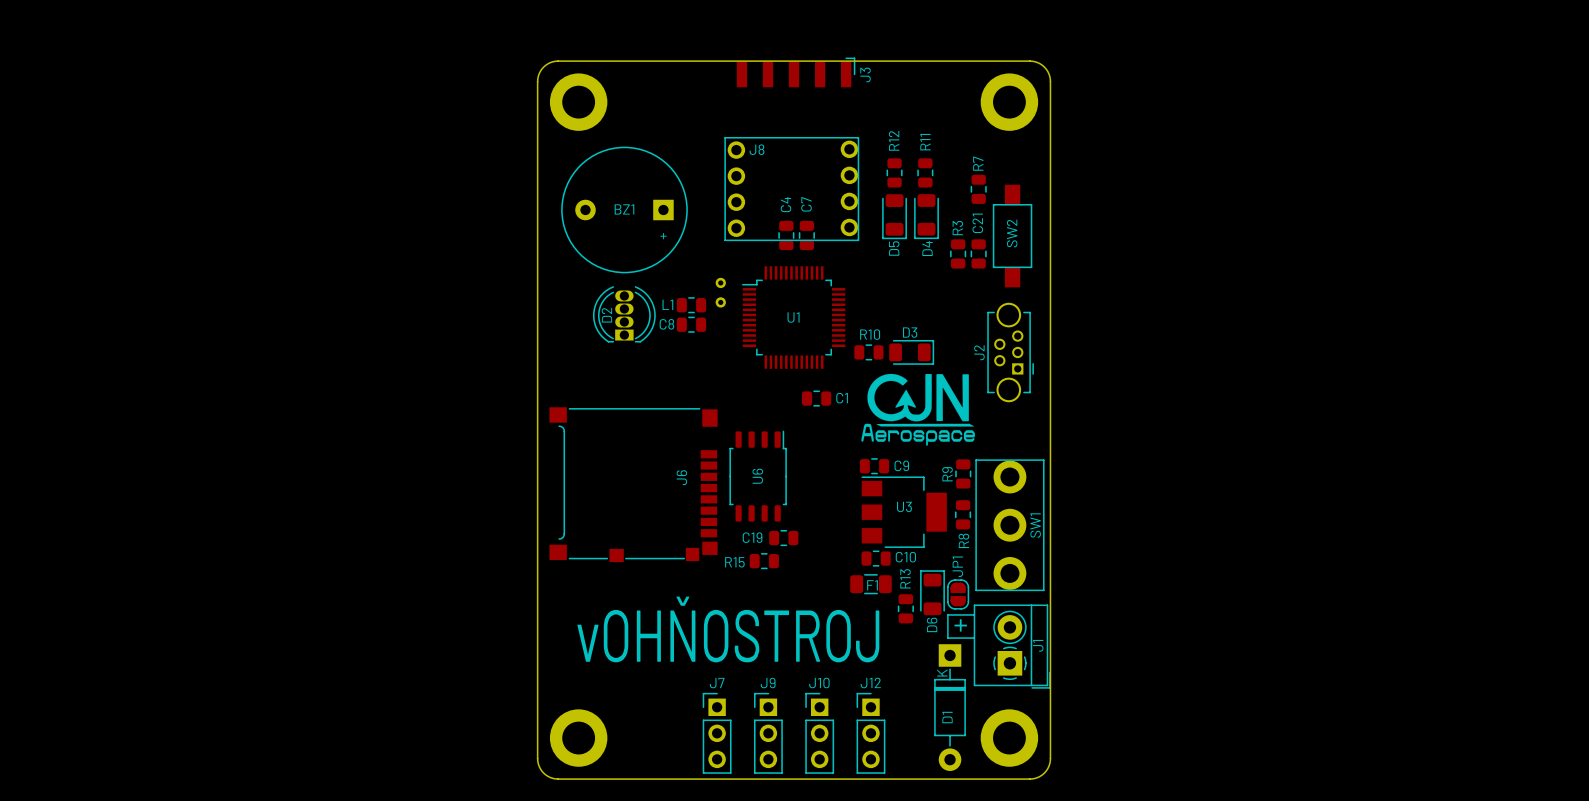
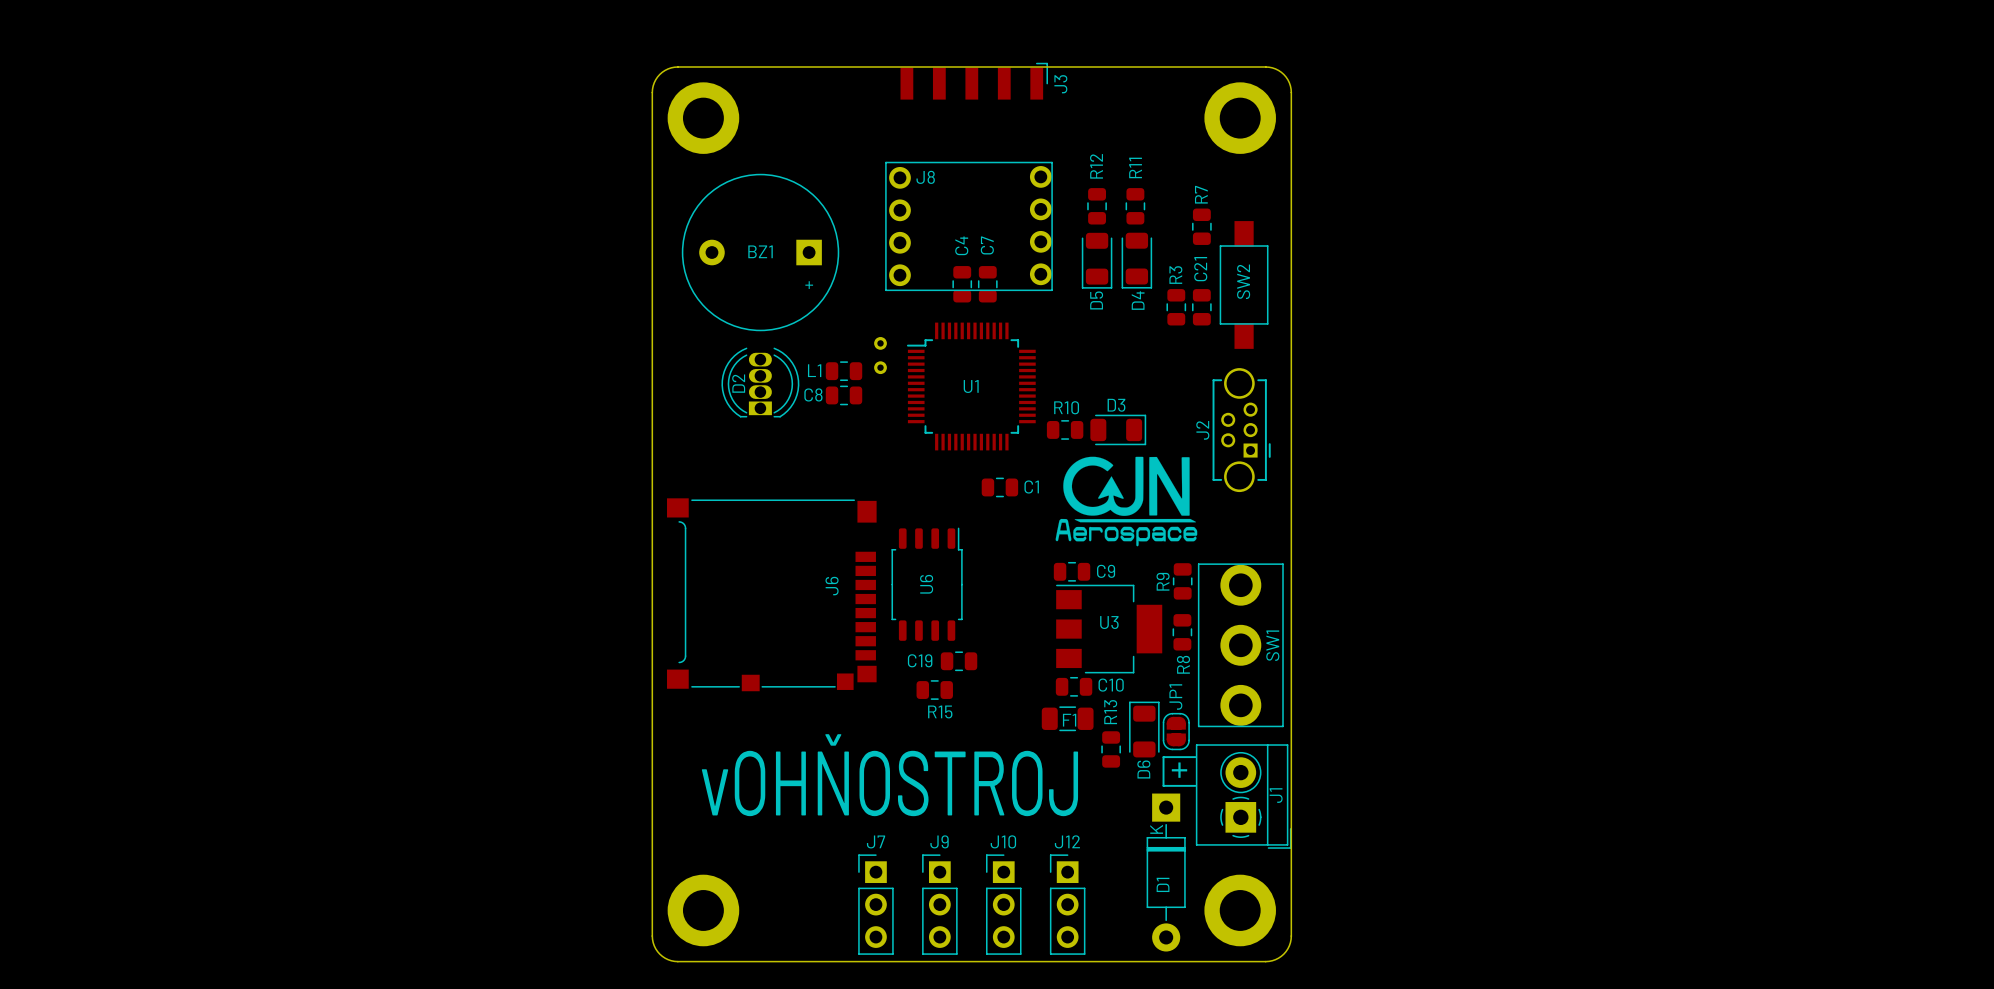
R15 name position: R15 (734, 562) -> R15 (940, 711)

